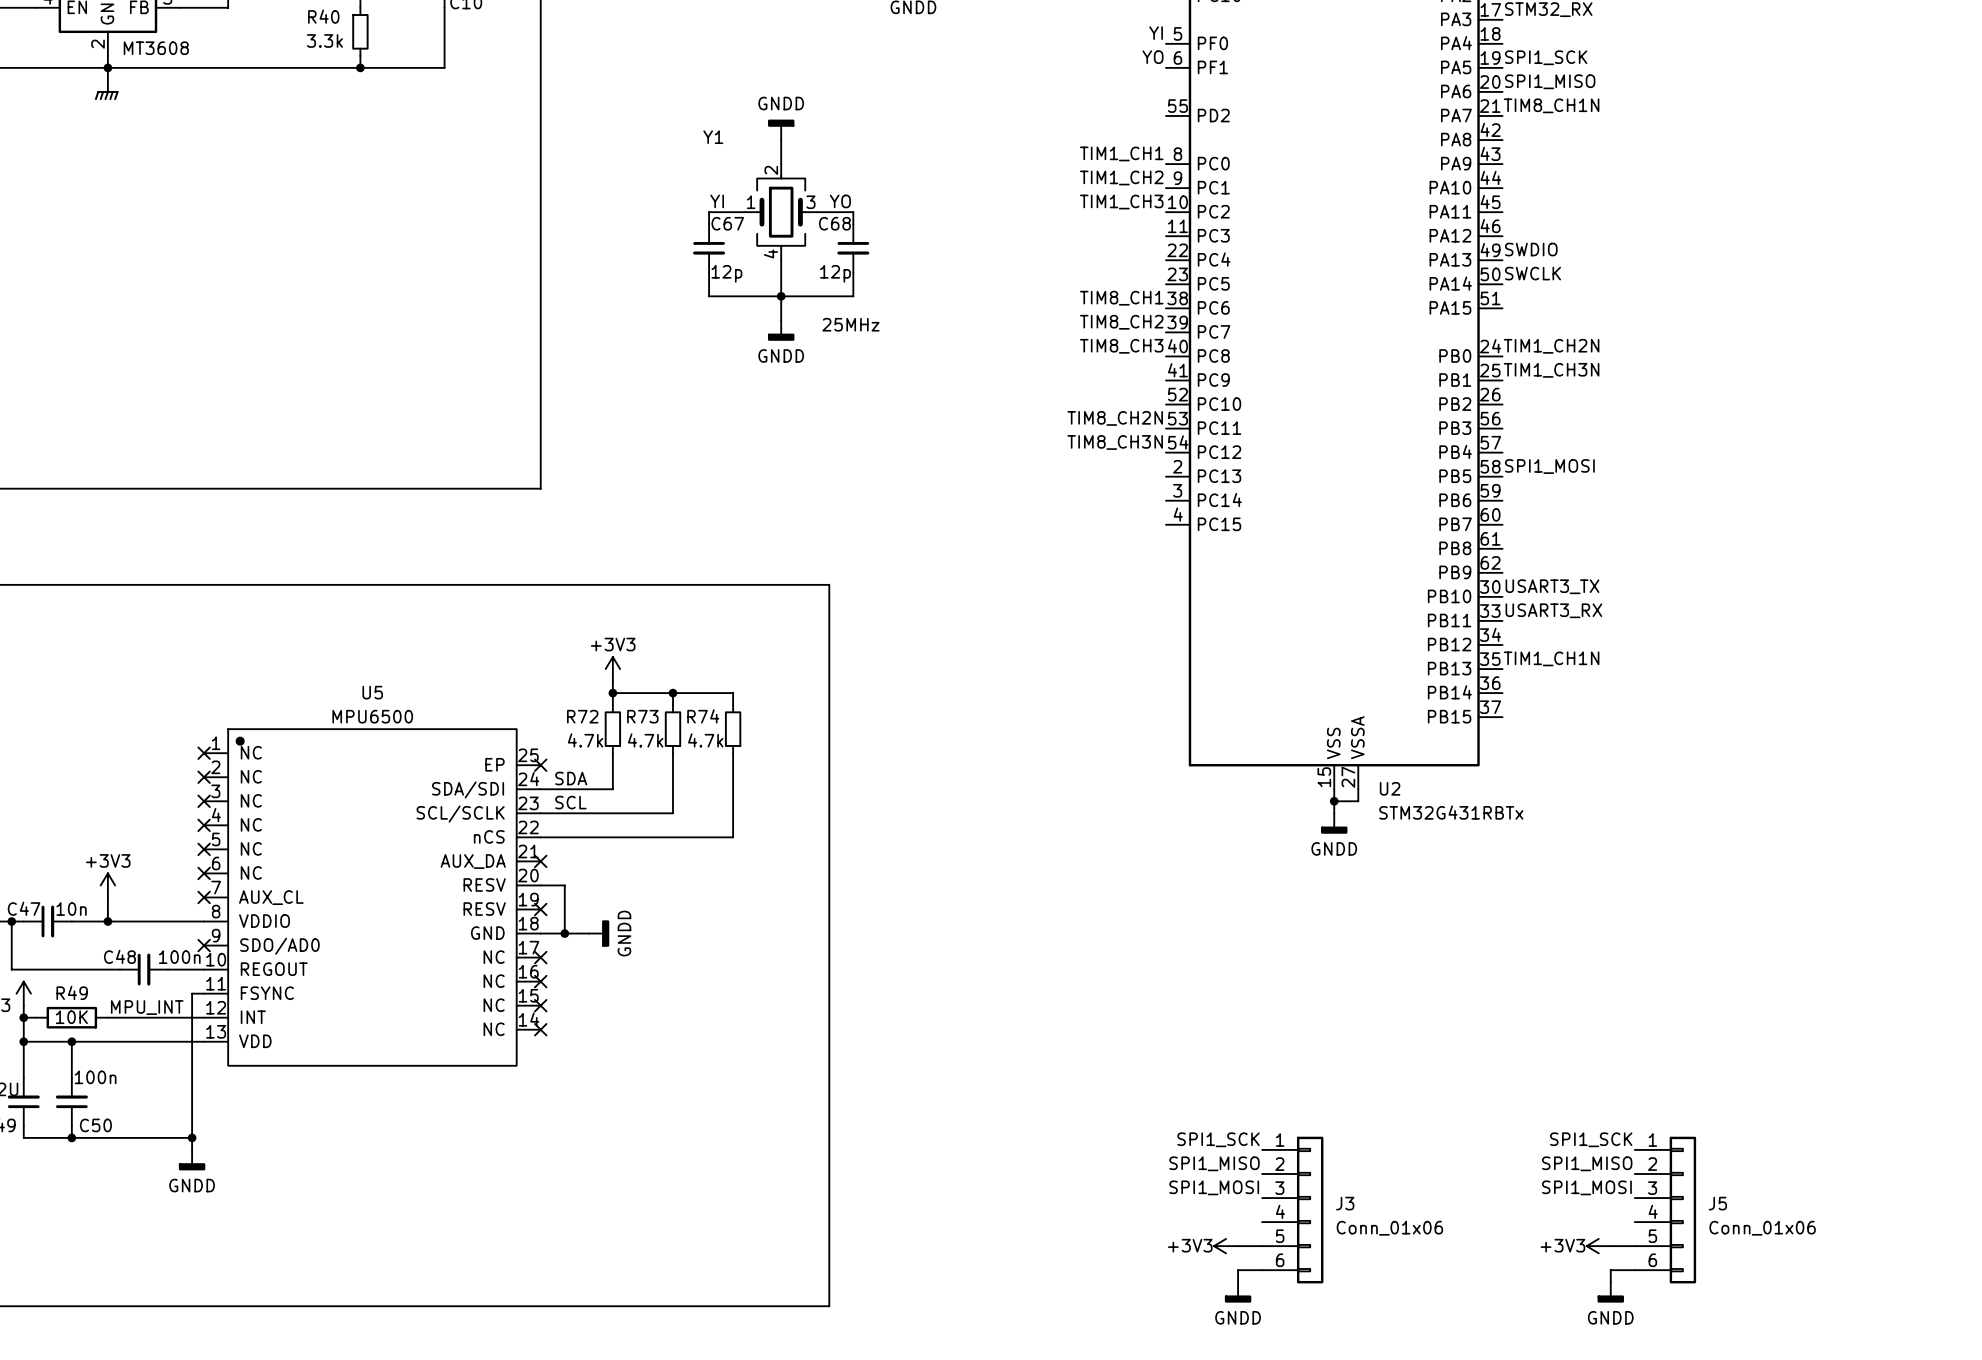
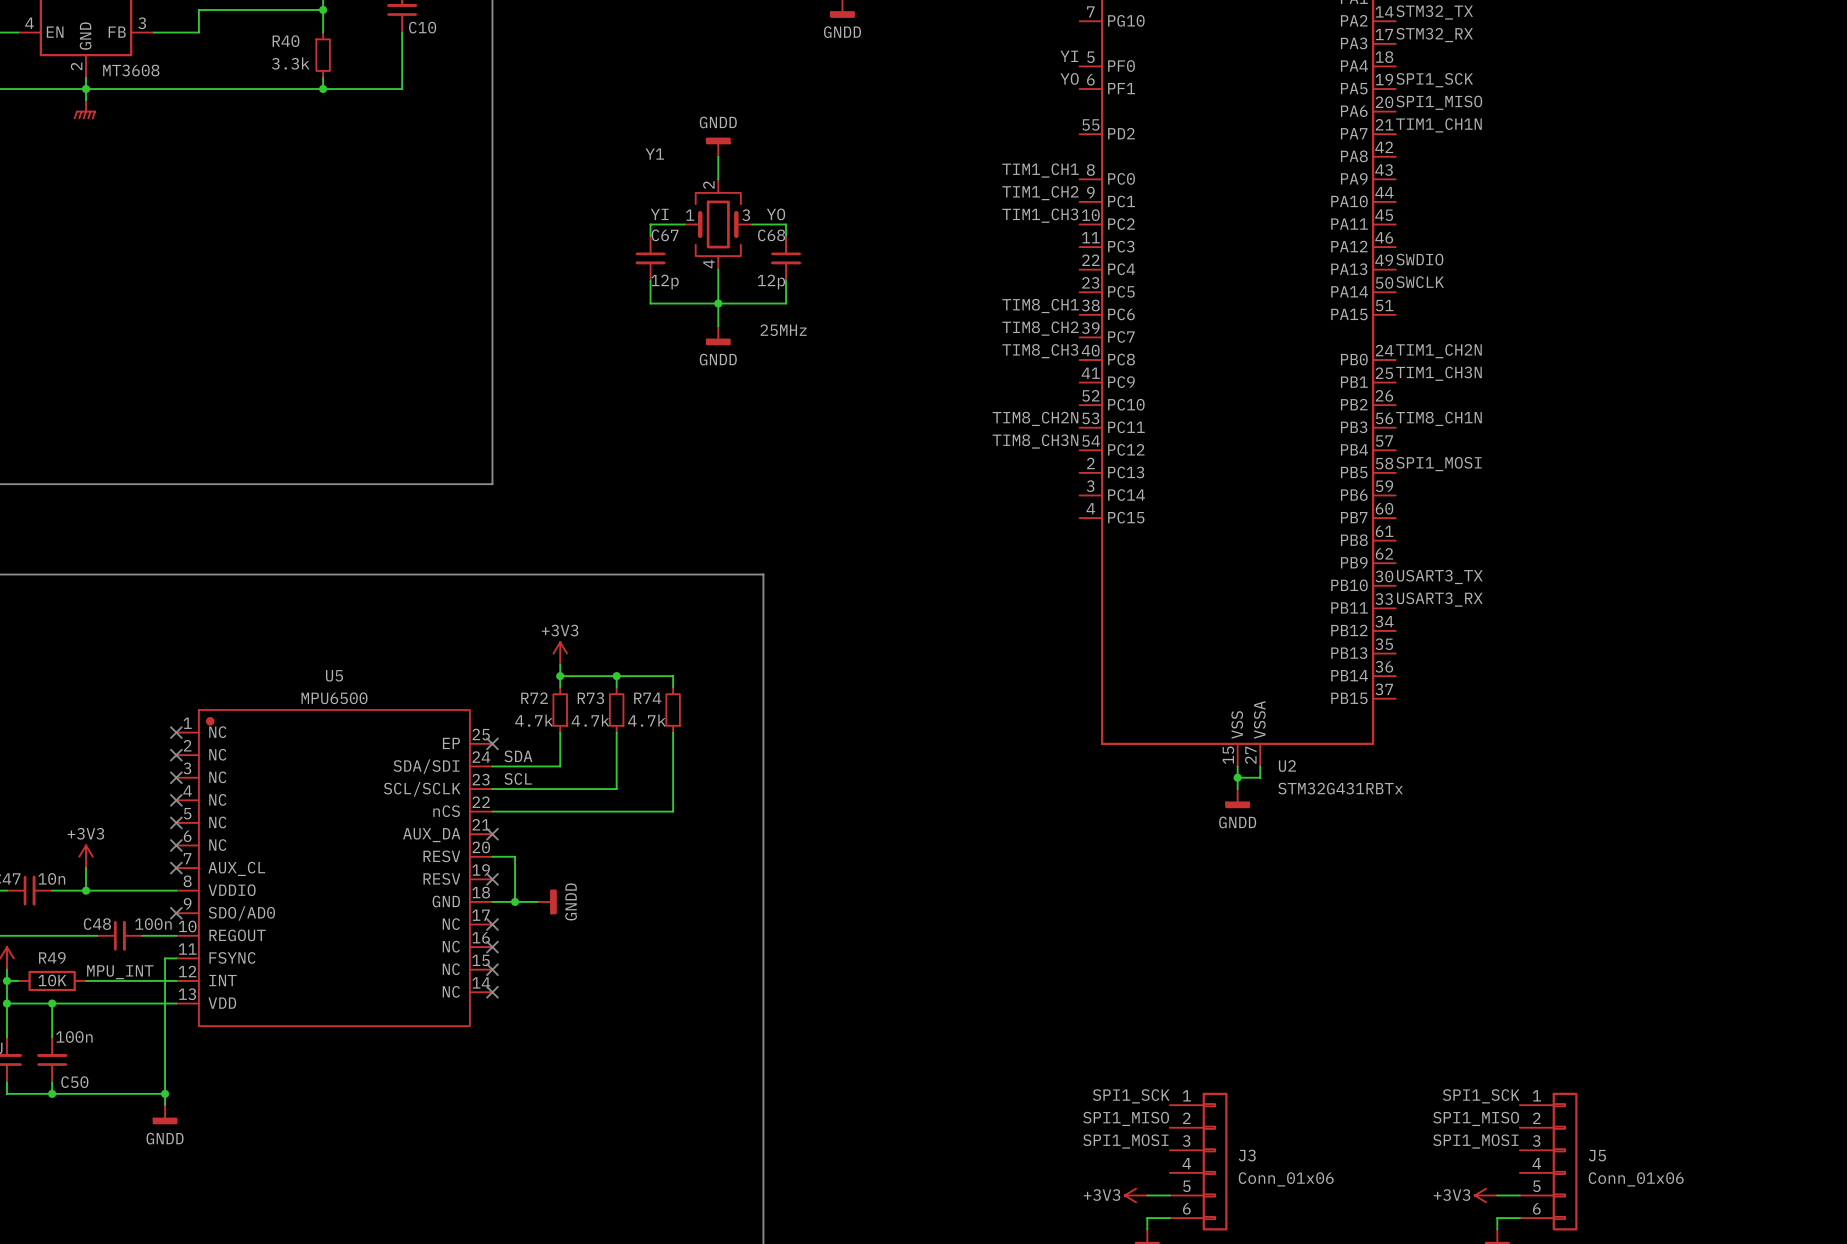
label: TIM8_CH1N (1551, 105) -> TIM1_CH1N (1438, 125)
label: none -> TIM8_CH1N (1438, 418)
label: TIM1_CH1N (1551, 658) -> none

